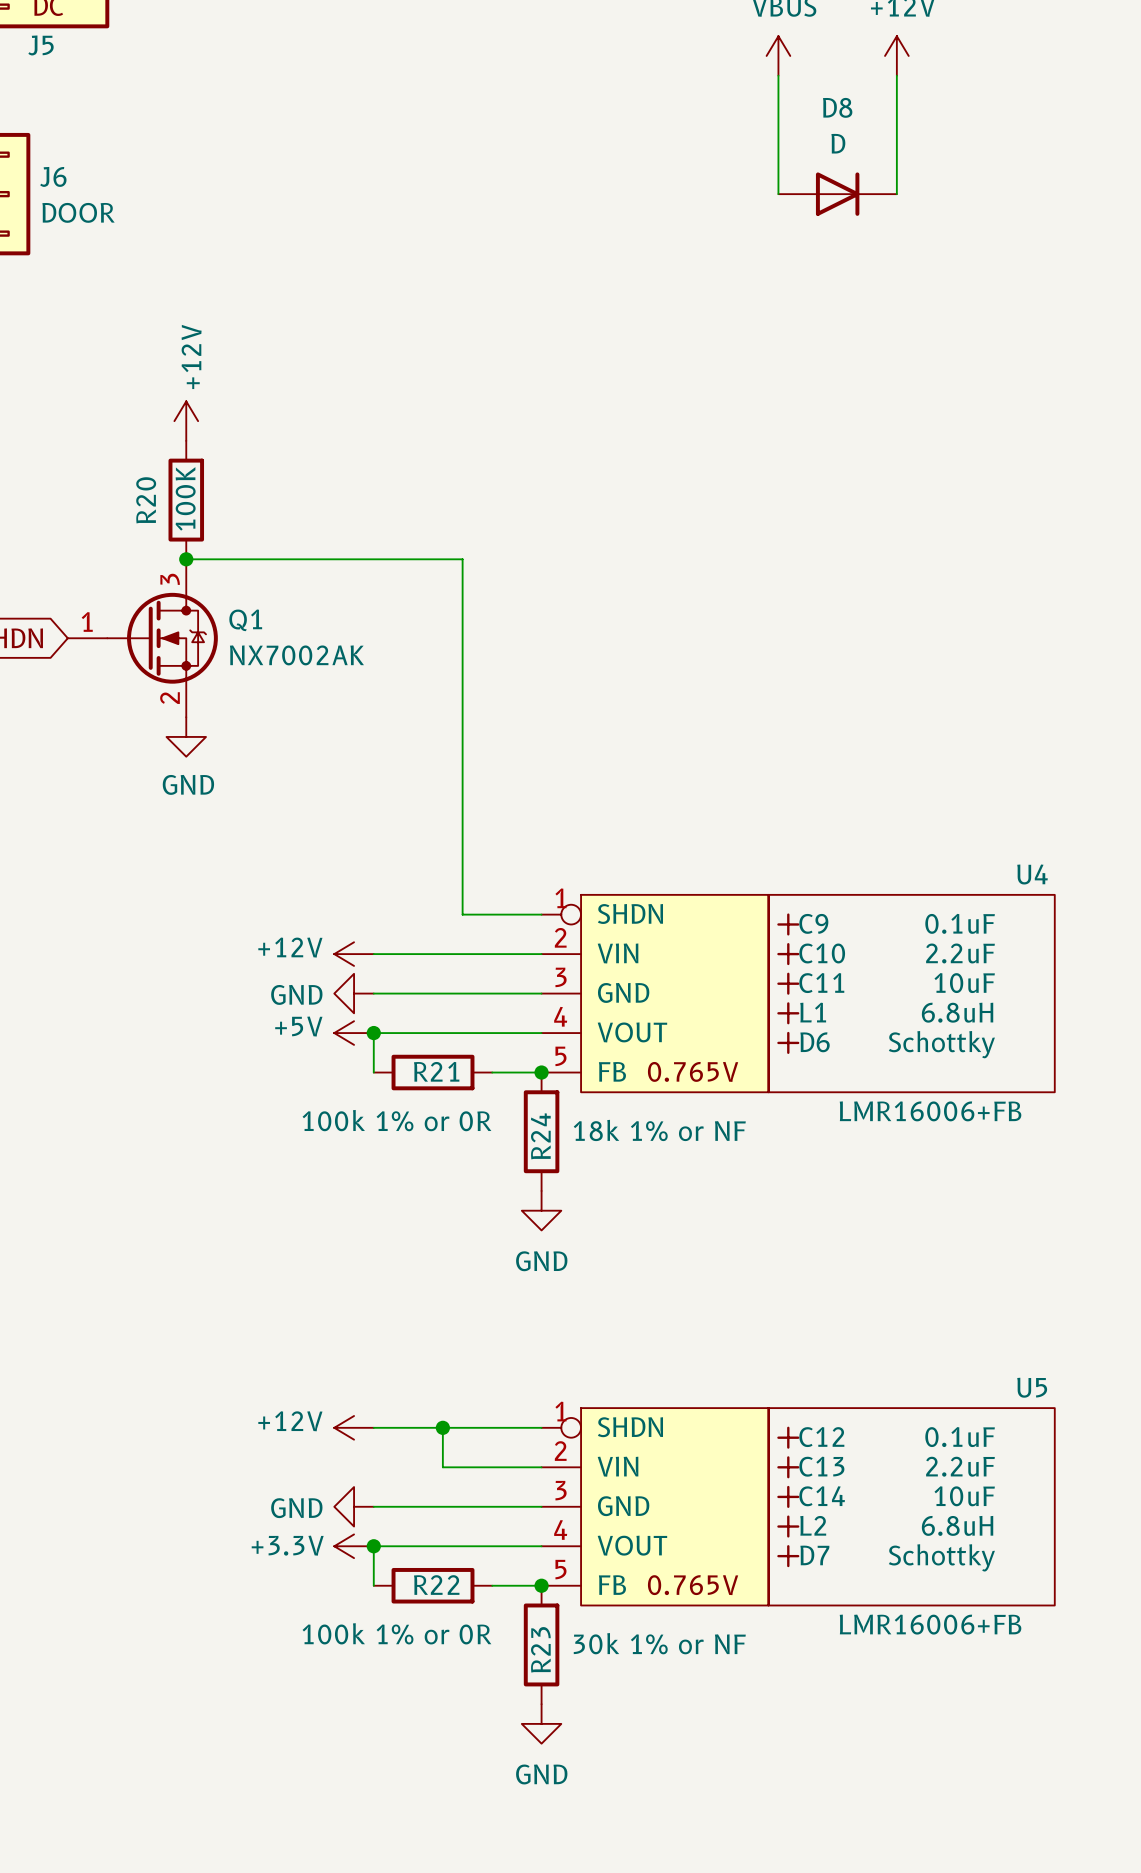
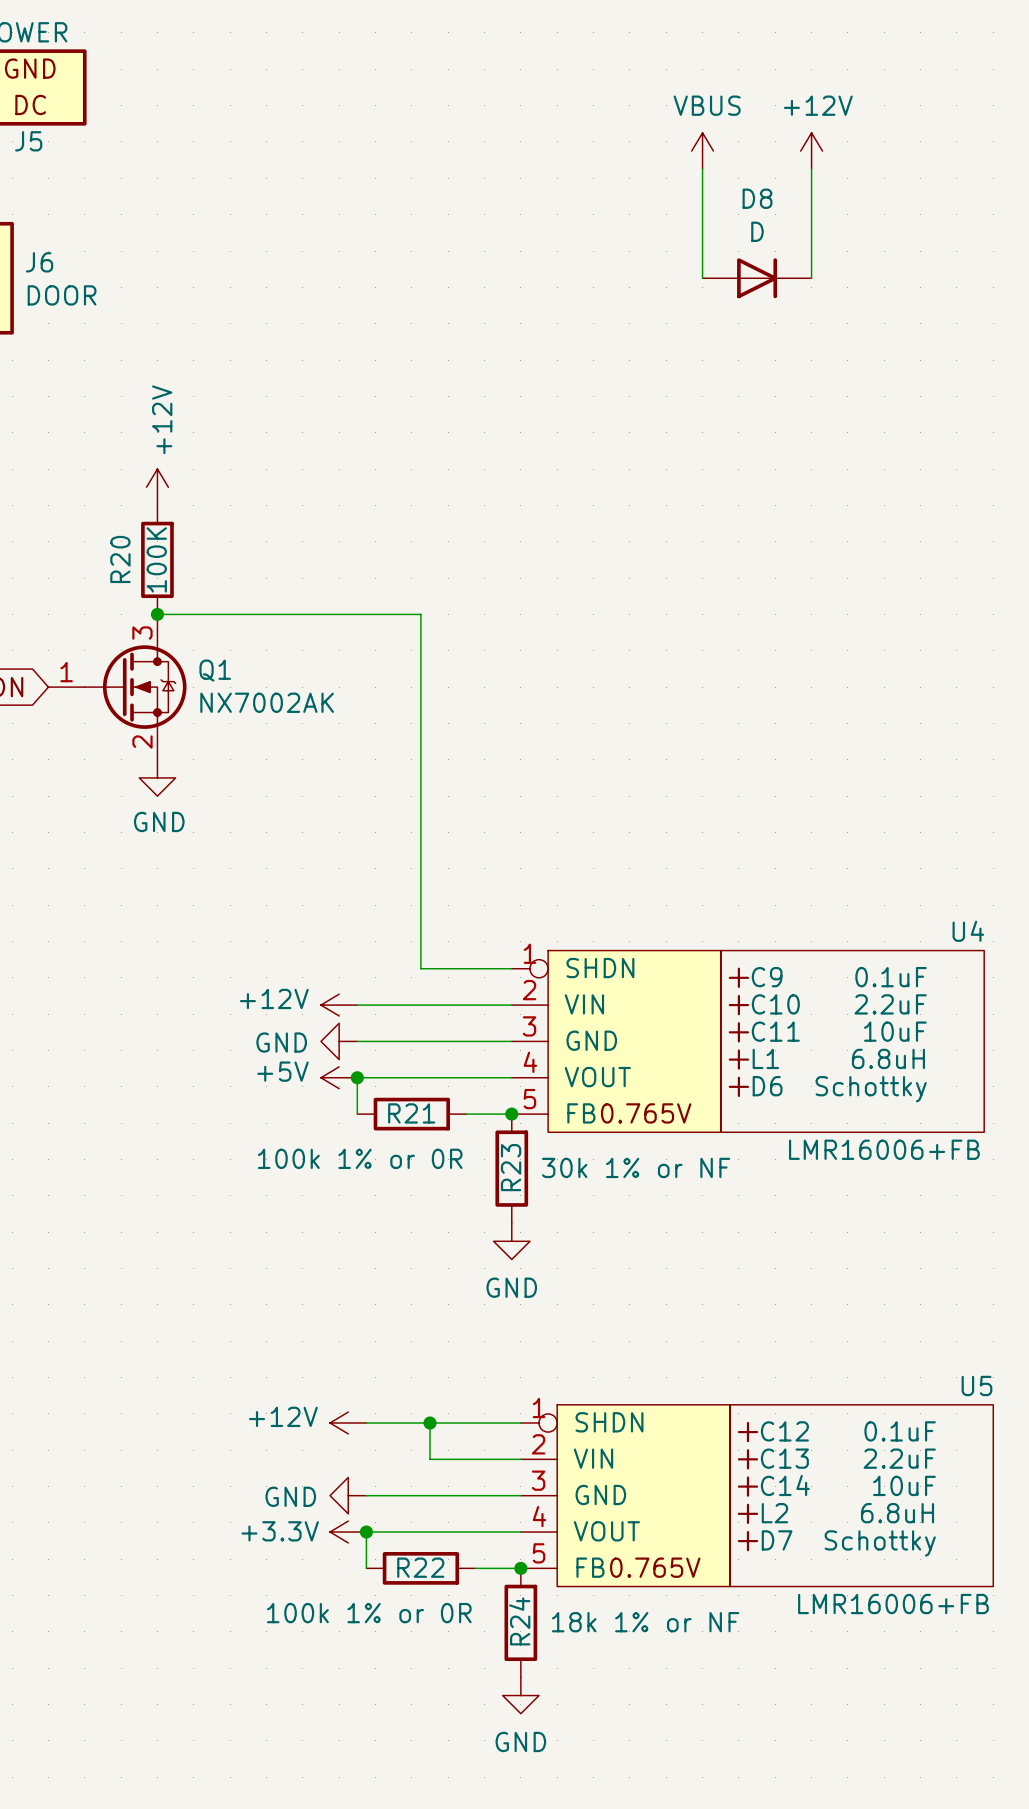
wire: (462, 559) (462, 914) (541, 914) -> (411, 614) (420, 614) (420, 968) (511, 968)
C9 position: (788, 924) -> (738, 977)
power symbol position: +12V (354, 954) -> +12V (339, 1005)
wire: (373, 954) (541, 954) -> (357, 1005) (511, 1005)
C10 position: (788, 954) -> (738, 1005)
C11 position: (788, 983) -> (738, 1032)
power symbol position: GND (354, 993) -> GND (339, 1041)
wire: (373, 993) (541, 993) -> (357, 1041) (511, 1041)
U4 position: (798, 993) -> (747, 1041)
L1 position: (788, 1013) -> (738, 1059)
power symbol position: +5V (354, 1033) -> +5V (339, 1077)
junction position: (373, 1033) -> (357, 1077)
wire: (541, 1033) (373, 1033) (373, 1072) -> (511, 1077) (357, 1077) (357, 1114)
D6 position: (788, 1042) -> (738, 1086)
R21 position: (433, 1072) -> (411, 1114)
wire: (492, 1072) (541, 1072) -> (466, 1114) (511, 1114)
junction position: (541, 1072) -> (511, 1114)
R24 position: (541, 1131) -> (520, 1622)
power symbol position: GND (541, 1210) -> GND (511, 1241)
power symbol position: +12V (354, 1427) -> +12V (348, 1422)
wire: (373, 1427) (541, 1427) -> (366, 1422) (520, 1422)
wire: (442, 1427) (442, 1467) (541, 1467) -> (430, 1422) (430, 1459) (520, 1459)
junction position: (442, 1427) -> (430, 1422)
C12 position: (788, 1437) -> (747, 1432)
C13 position: (788, 1467) -> (747, 1459)
C14 position: (788, 1496) -> (747, 1486)
power symbol position: GND (354, 1506) -> GND (348, 1495)
wire: (373, 1506) (541, 1506) -> (366, 1495) (520, 1495)
U5 position: (798, 1506) -> (757, 1495)
L2 position: (788, 1526) -> (747, 1513)
power symbol position: +3.3V (354, 1546) -> +3.3V (348, 1532)
junction position: (373, 1546) -> (366, 1532)
wire: (541, 1546) (373, 1546) (373, 1585) -> (520, 1532) (366, 1532) (366, 1568)
D7 position: (788, 1556) -> (747, 1541)
R22 position: (433, 1585) -> (420, 1568)
wire: (492, 1585) (541, 1585) -> (475, 1568) (520, 1568)
junction position: (541, 1585) -> (520, 1568)
R23 position: (541, 1644) -> (511, 1168)
power symbol position: GND (541, 1723) -> GND (520, 1695)

